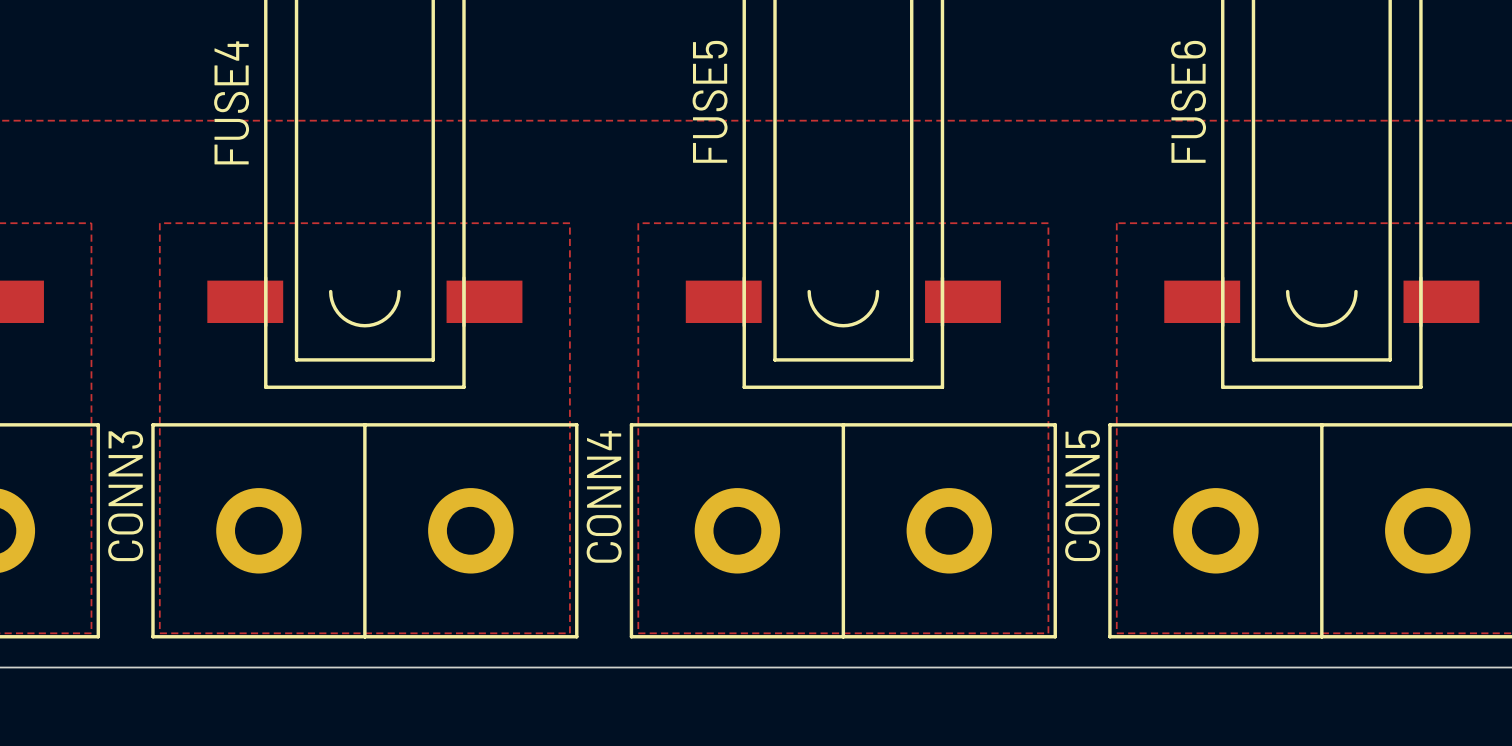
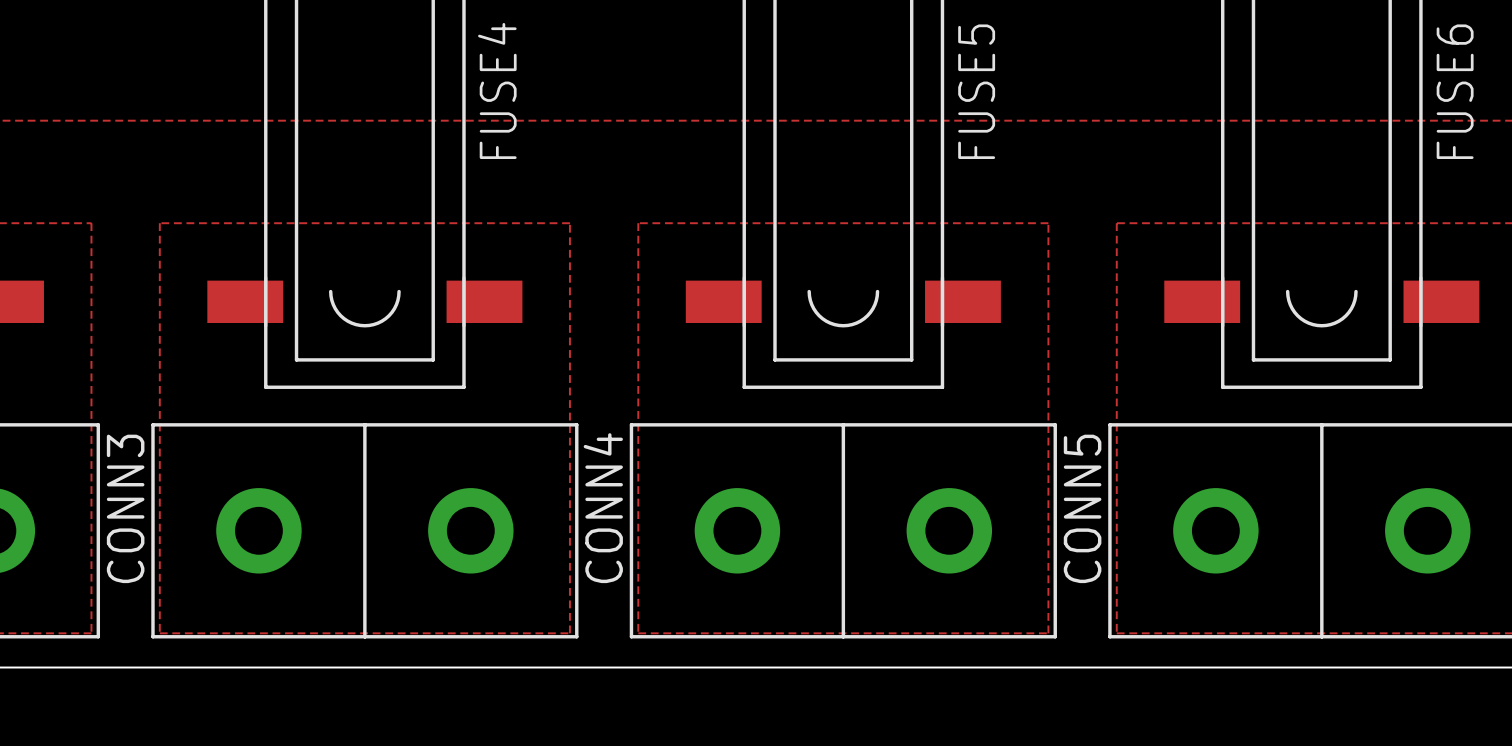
FUSE5 name position: FUSE5 (710, 101) -> FUSE5 (976, 91)
FUSE6 name position: FUSE6 (1188, 101) -> FUSE6 (1455, 91)
FUSE4 name position: FUSE4 (231, 102) -> FUSE4 (497, 90)

